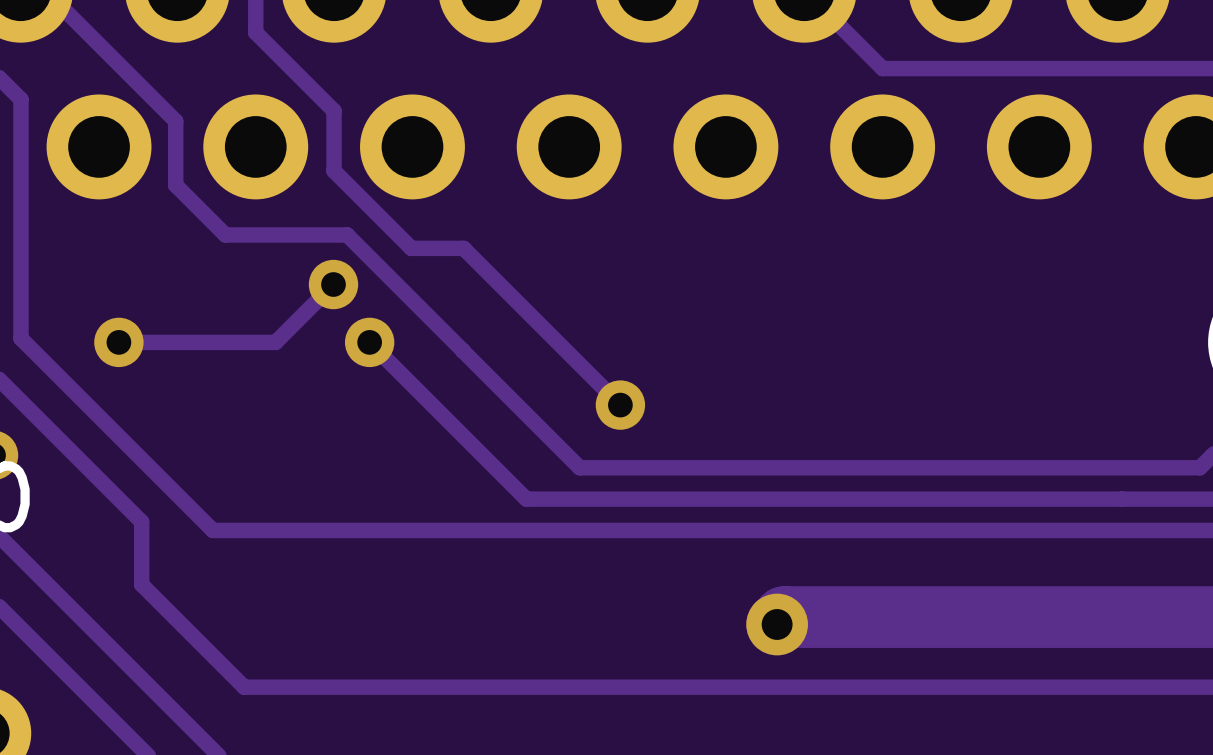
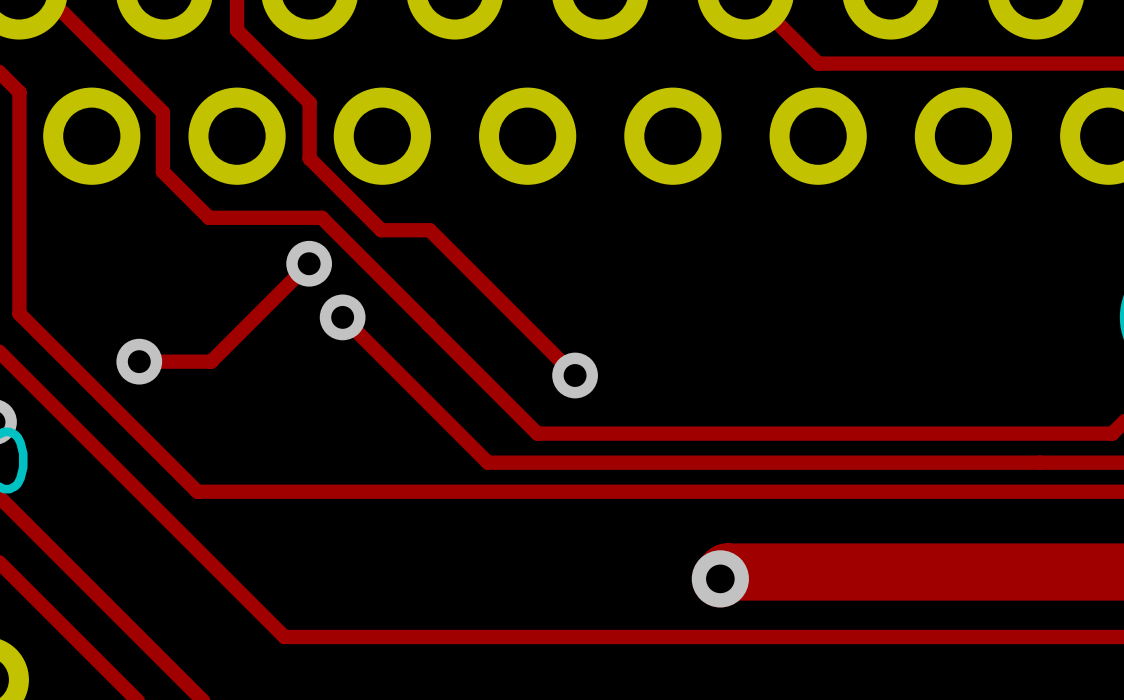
track: (118, 342) (275, 342) -> (139, 361) (211, 361) (255, 317)
via position: (118, 342) -> (139, 361)
track: (141, 521) (141, 584) (244, 687) (306, 687) -> (131, 483) (284, 636)

